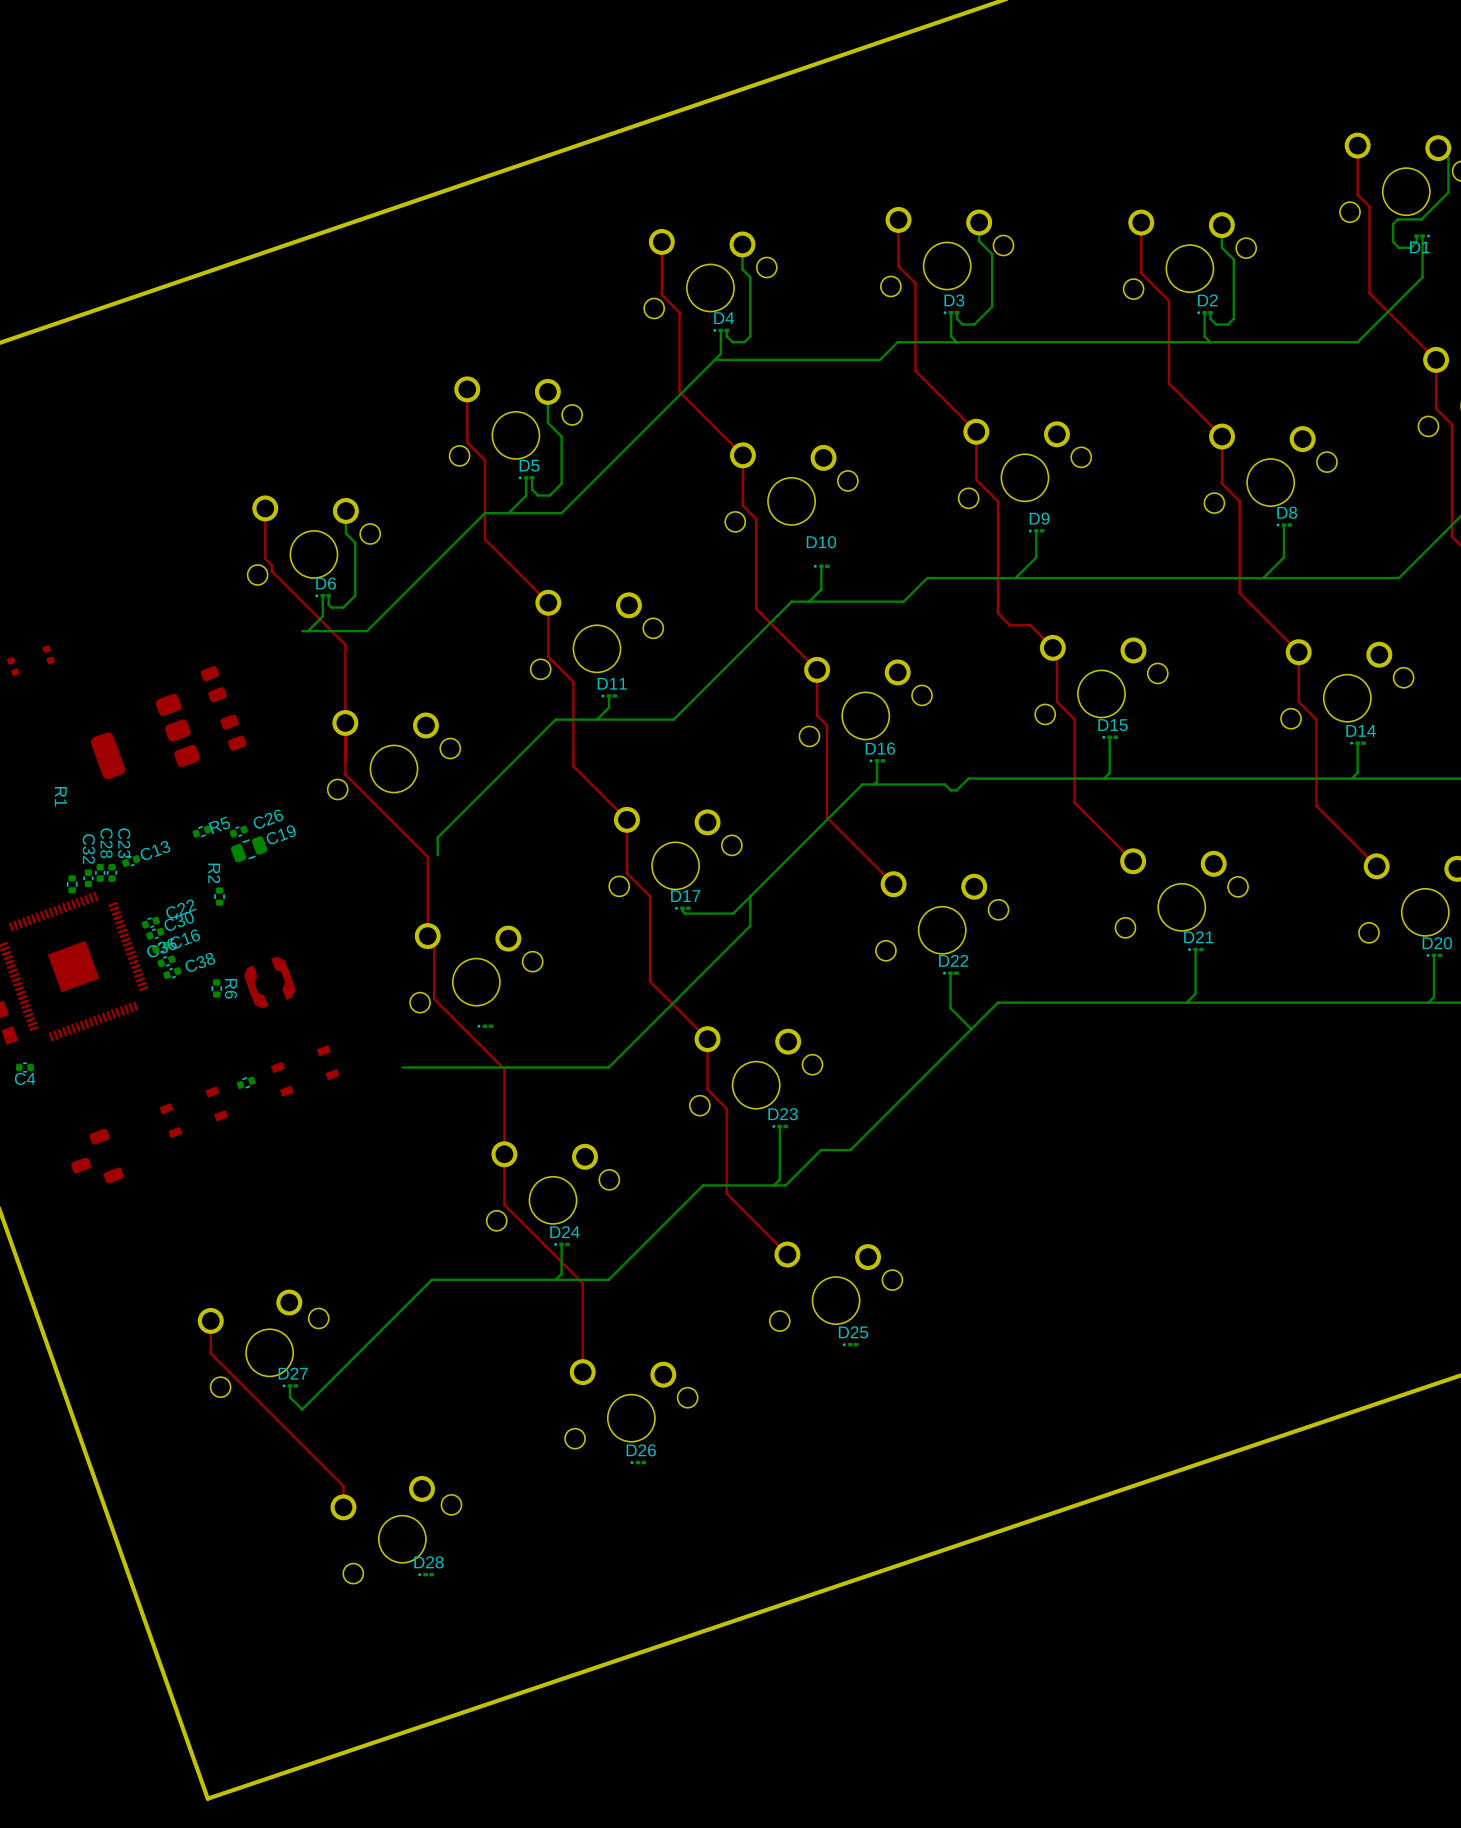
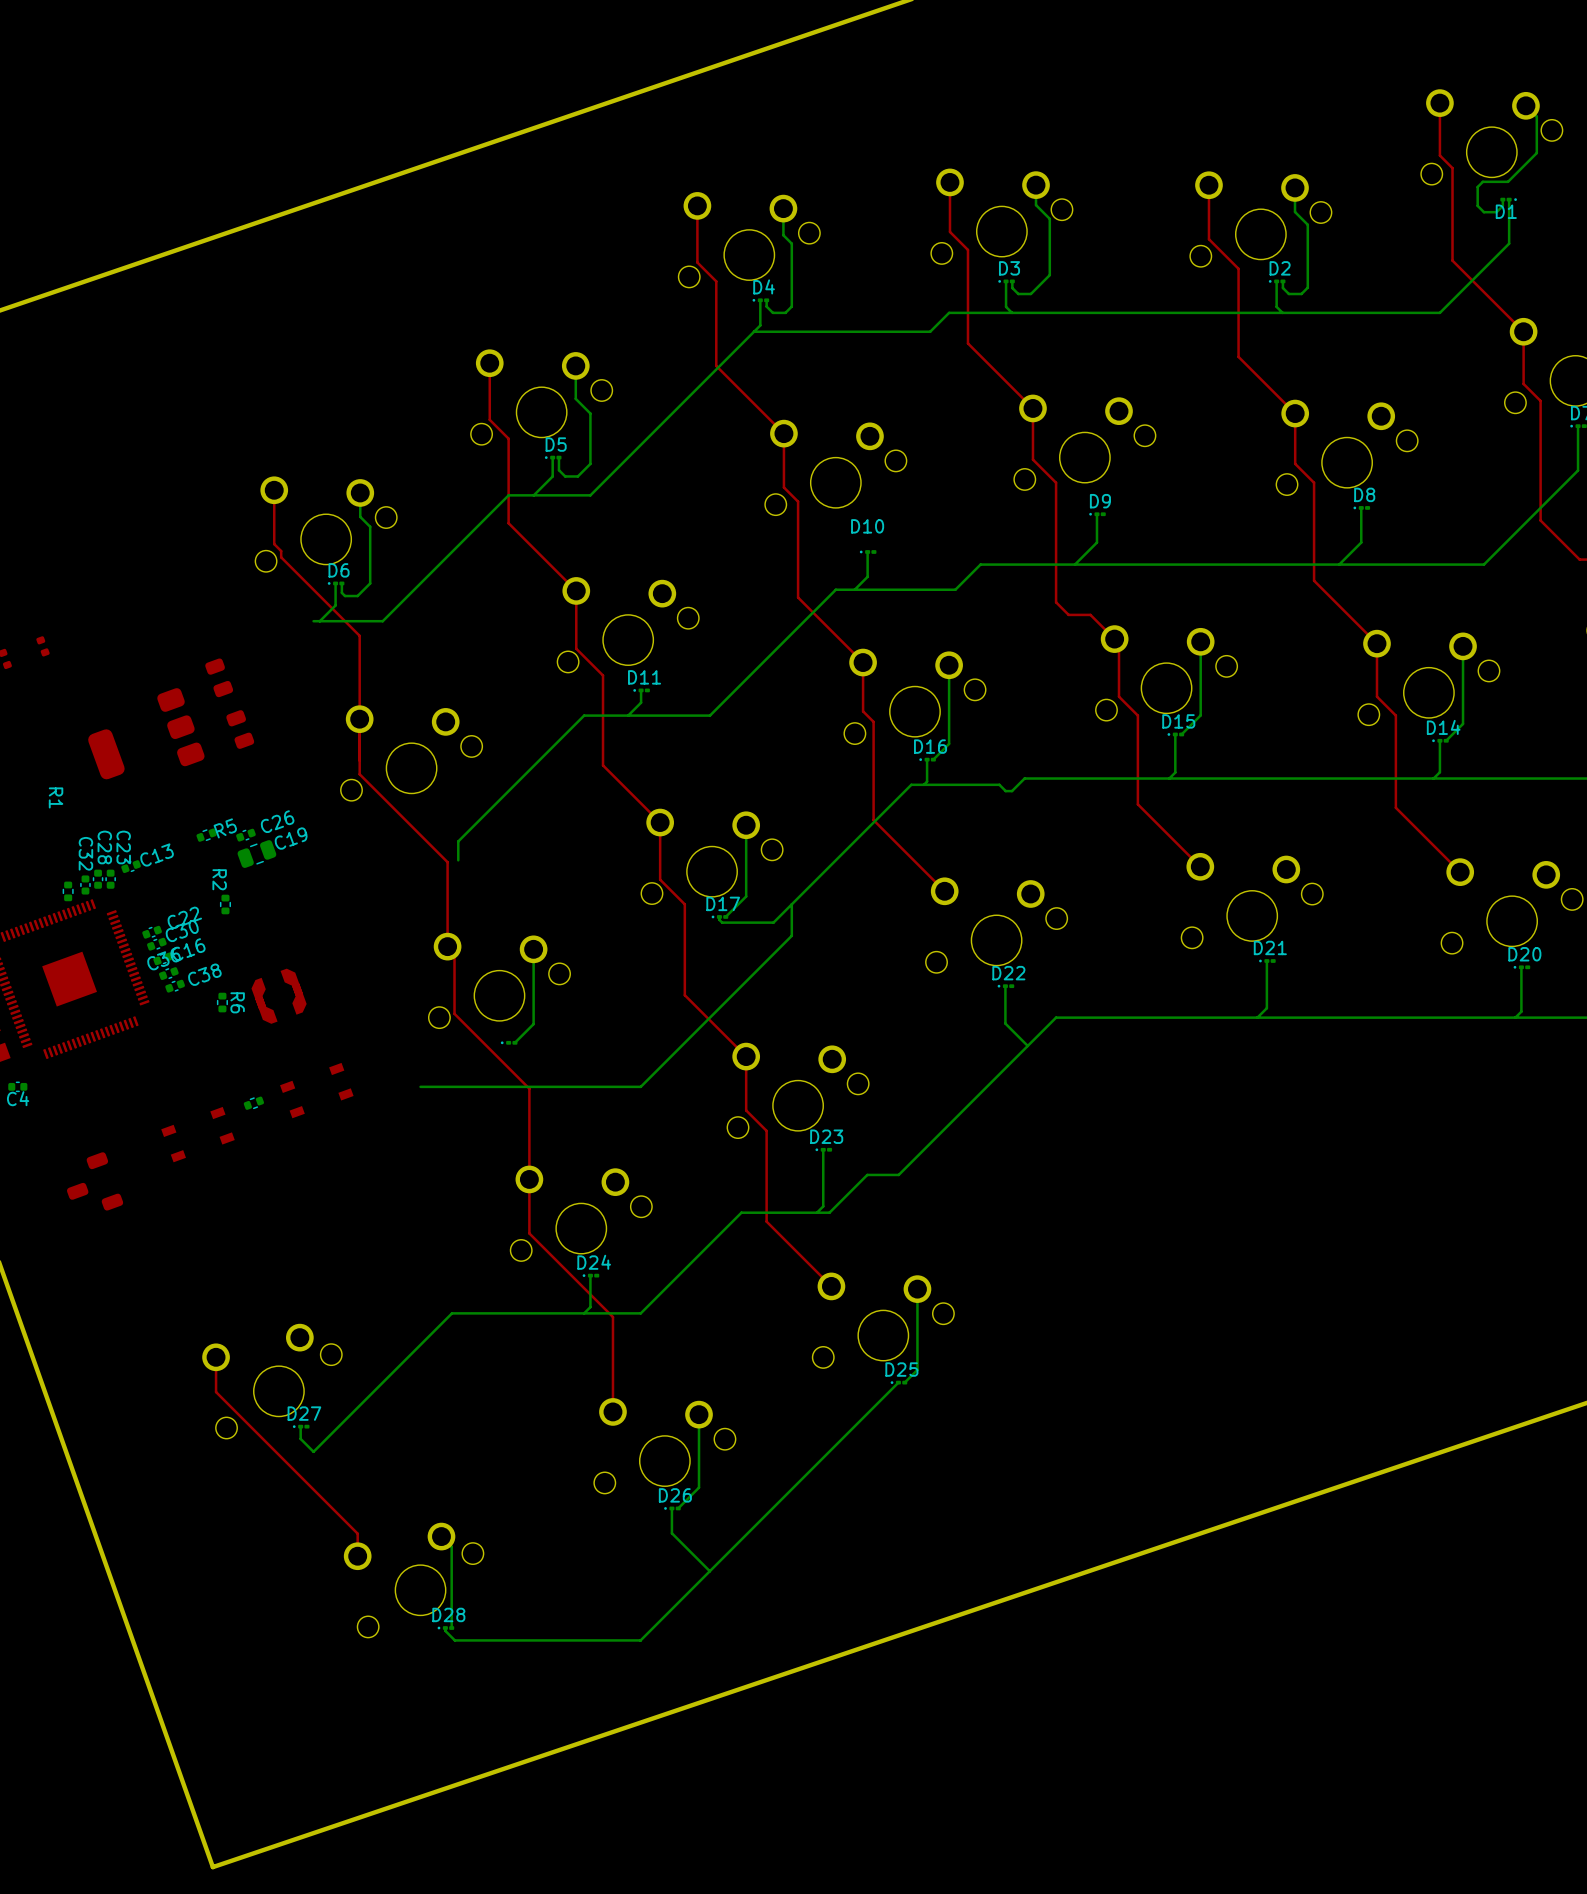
bottom track: none -> (1200, 641) (1200, 715) (1181, 734)
bottom track: none -> (1463, 646) (1463, 723) (1446, 740)
bottom track: none -> (949, 665) (949, 743) (933, 759)
bottom track: none -> (746, 825) (746, 896) (725, 916)
bottom track: none -> (533, 949) (533, 1024) (514, 1042)
bottom track: none -> (917, 1289) (917, 1369) (904, 1382)
bottom track: none -> (898, 1382) (640, 1640)
bottom track: none -> (699, 1414) (699, 1487) (678, 1508)
bottom track: none -> (671, 1508) (671, 1533) (709, 1571)
bottom track: none -> (441, 1536) (451, 1546) (451, 1628)
bottom track: none -> (445, 1628) (445, 1630) (454, 1640) (640, 1640)

